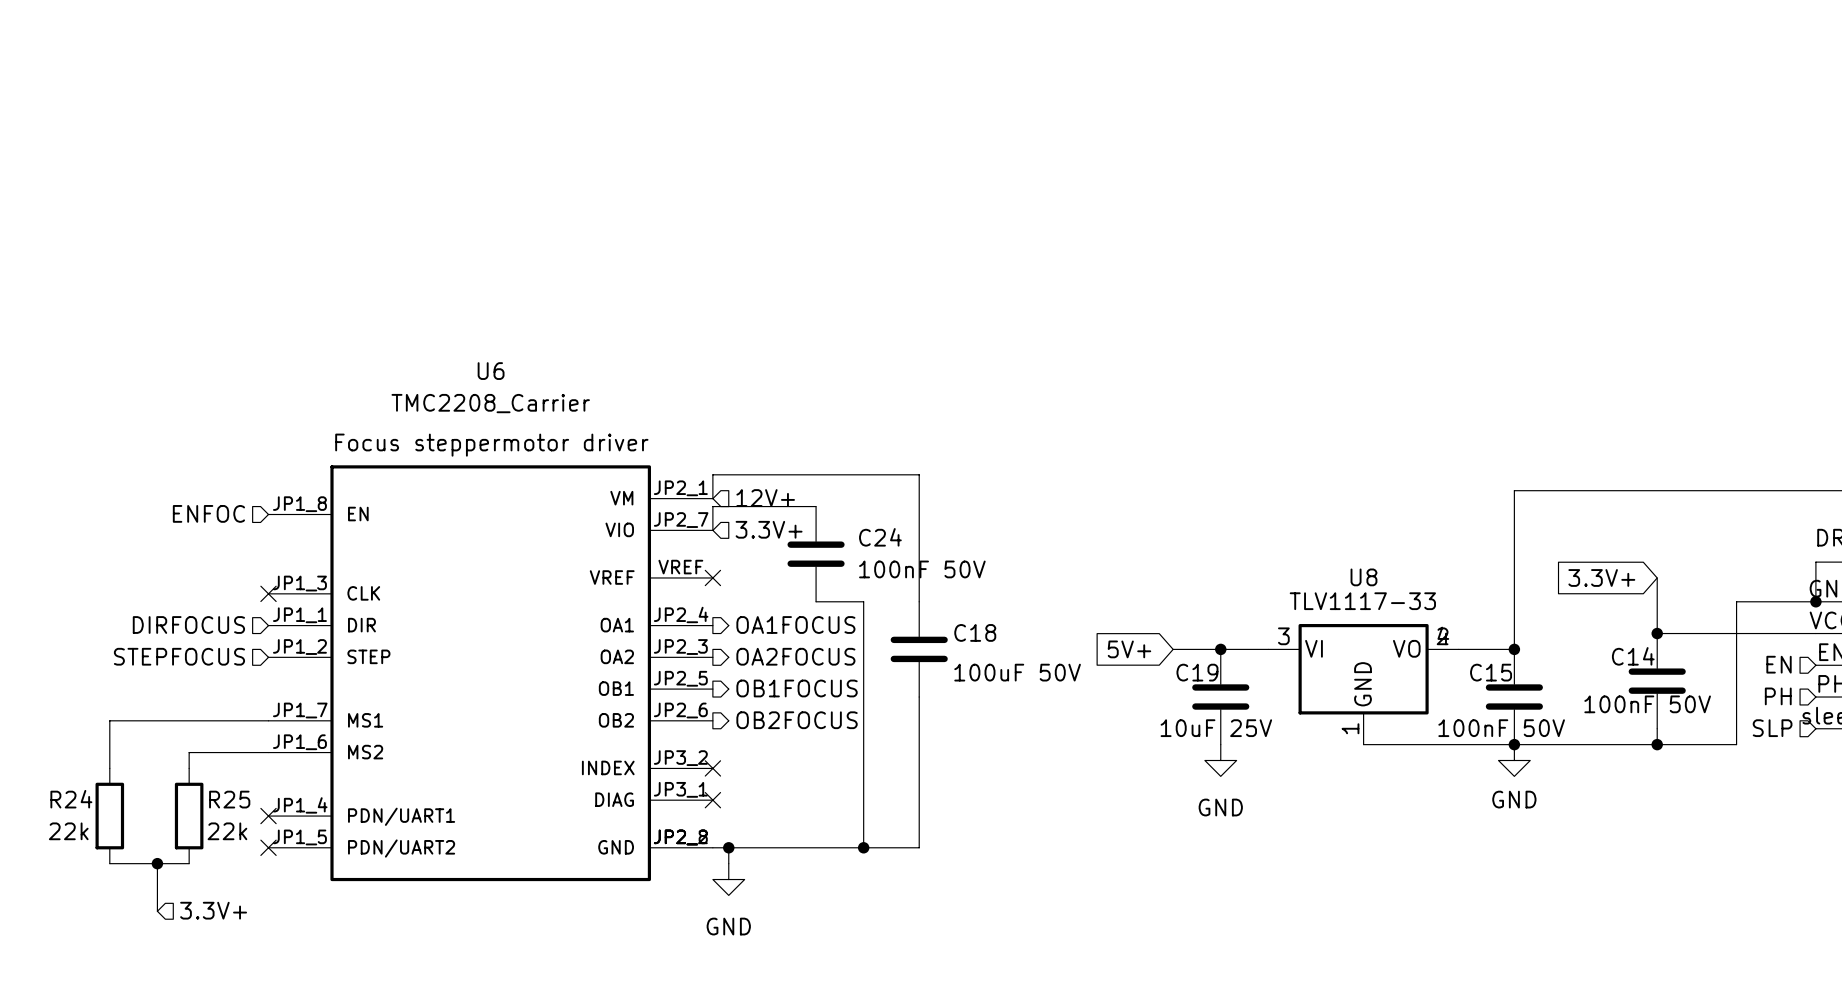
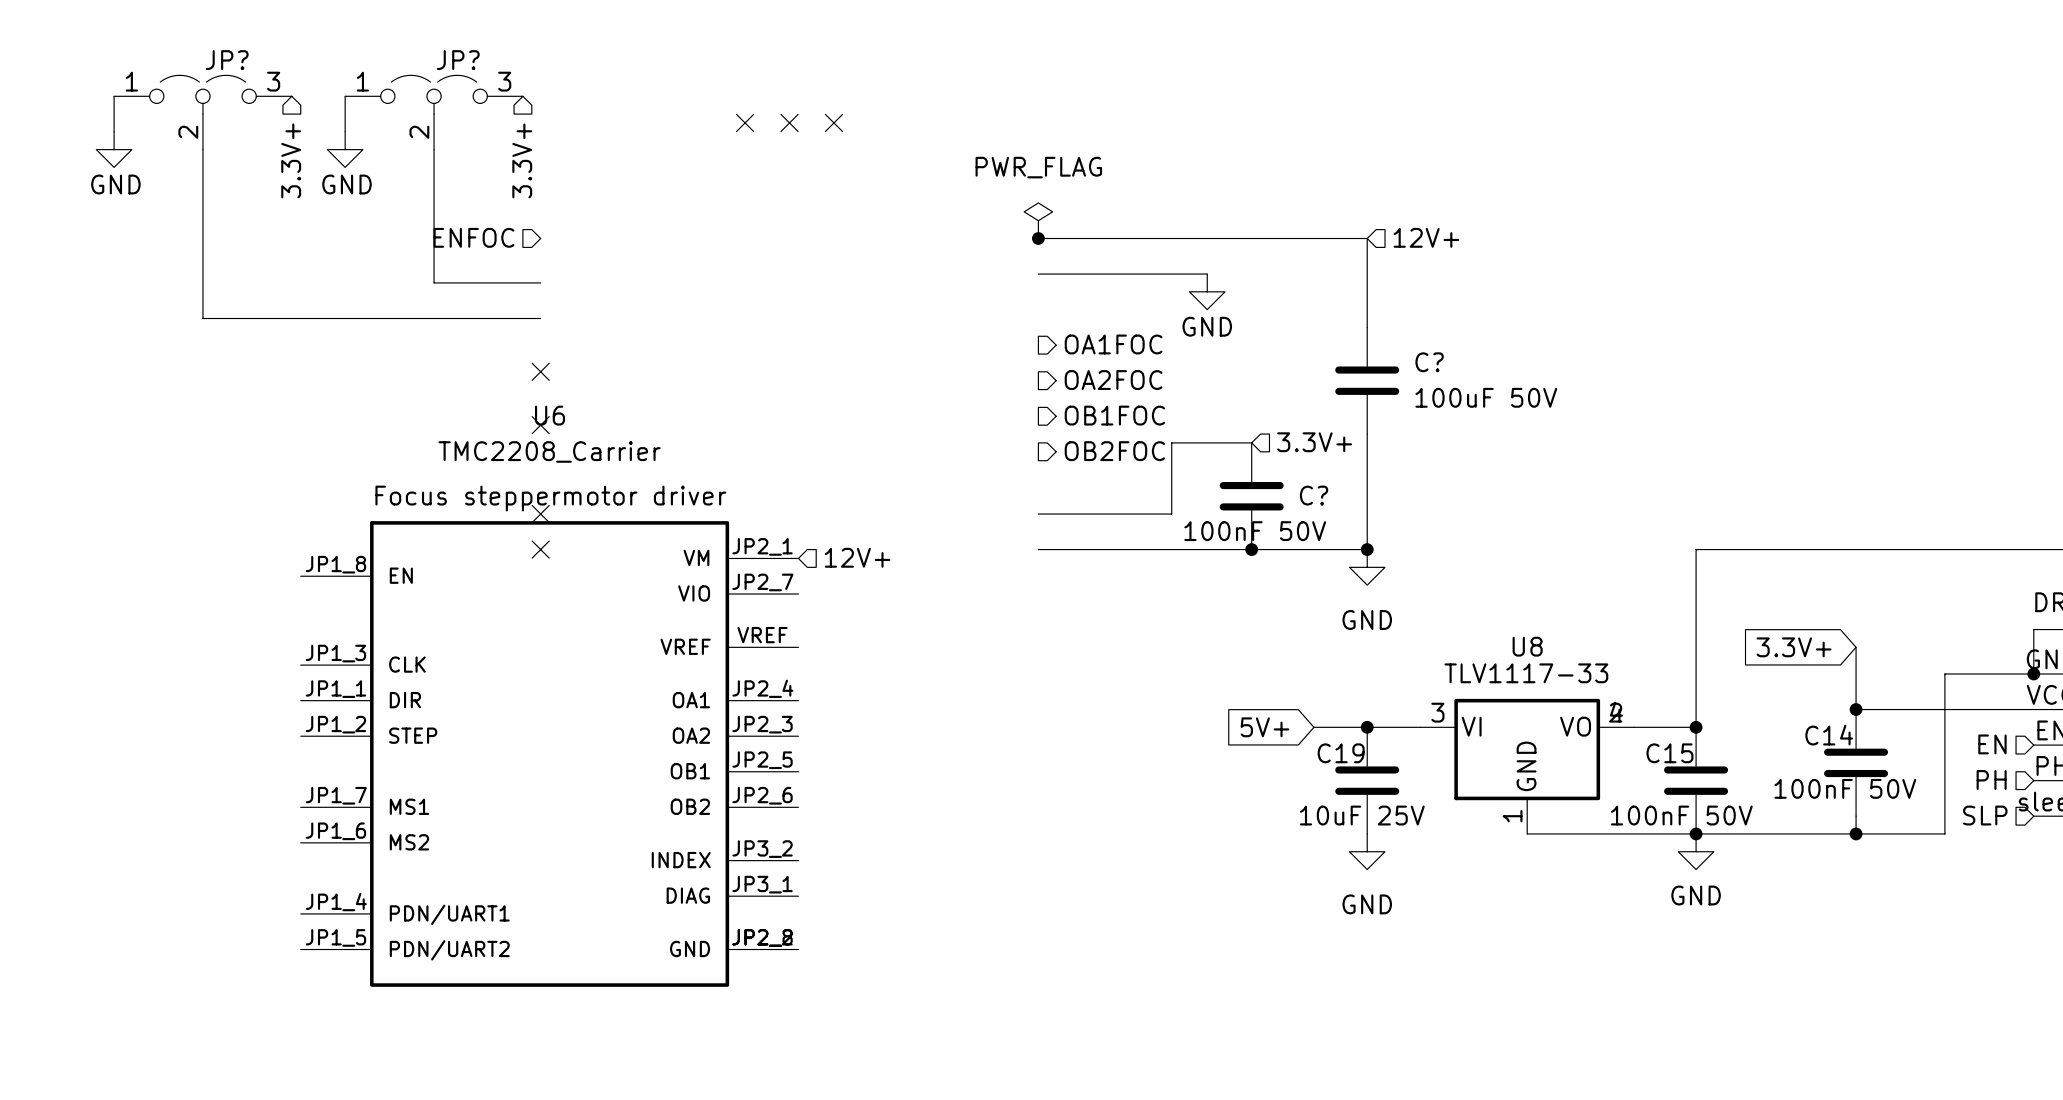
wire: none -> (114, 96) (114, 131)
wire: none -> (345, 96) (345, 131)
JP?: none -> (202, 112)
JP?: none -> (434, 112)
no-connect mark: none -> (745, 122)
no-connect mark: none -> (789, 122)
no-connect mark: none -> (833, 122)
power symbol: none -> GND (114, 149)
wire: none -> (202, 149) (202, 318) (540, 318)
power symbol: none -> GND (345, 149)
wire: none -> (434, 149) (434, 282) (540, 282)
hierarchical label: none -> 3.3V+ (291, 160)
hierarchical label: none -> 3.3V+ (522, 160)
power symbol: none -> PWR_FLAG (1038, 220)
hierarchical label: none -> ENFOC (473, 237)
wire: none -> (1038, 238) (1367, 238) (1367, 327)
junction: none -> (1038, 238)
hierarchical label: none -> 12V+ (1426, 237)
wire: none -> (1038, 274) (1207, 274)
power symbol: none -> GND (1207, 291)
hierarchical label: none -> OA1FOC (1113, 344)
no-connect mark: none -> (540, 371)
hierarchical label: none -> OA2FOC (1113, 380)
C?: none -> 100uF 50V (1367, 380)
hierarchical label: none -> OB1FOC (1114, 415)
no-connect mark: none -> (540, 425)
wire: none -> (1367, 434) (1367, 549) (1038, 549)
hierarchical label: none -> 3.3V+ (1314, 442)
wire: none -> (1251, 442) (1171, 442) (1171, 514) (1038, 514)
hierarchical label: none -> OB2FOC (1114, 451)
C?: none -> 100nF 50V (1251, 496)
no-connect mark: none -> (540, 514)
no-connect mark: none -> (540, 549)
junction: none -> (1251, 549)
junction: none -> (1367, 549)
wire: (712, 498) (712, 474) (919, 474) (919, 601) -> none
wire: (816, 506) (712, 506) (712, 530) -> none
power symbol: none -> GND (1367, 567)
hierarchical label: ENFOC (208, 513) -> none
hierarchical label: 3.3V+ (769, 529) -> none
C24: 100nF 50V (816, 554) -> none
no-connect mark: (712, 577) -> none
no-connect mark: (268, 593) -> none
wire: (816, 601) (863, 601) (863, 847) -> none
hierarchical label: DIRFOCUS (188, 625) -> none
hierarchical label: OA1FOCUS (795, 625) -> none
C18: 100uF 50V (919, 649) -> none
hierarchical label: STEPFOCUS (179, 656) -> none
hierarchical label: OA2FOCUS (795, 656) -> none
hierarchical label: OB1FOCUS (797, 688) -> none
wire: (919, 697) (919, 847) (712, 847) -> none
wire: (268, 720) (109, 720) (109, 768) -> none
hierarchical label: OB2FOCUS (797, 720) -> none
wire: (268, 752) (189, 752) (189, 768) -> none
no-connect mark: (712, 768) -> none
no-connect mark: (712, 800) -> none
R24: 22k (109, 816) -> none
R25: 22k (189, 816) -> none
no-connect mark: (268, 816) -> none
no-connect mark: (268, 847) -> none
wire: (728, 847) (728, 863) -> none
junction: (728, 847) -> none
junction: (863, 847) -> none
wire: (109, 863) (189, 863) -> none
wire: (157, 863) (157, 911) -> none
junction: (157, 863) -> none
power symbol: GND (728, 879) -> none
hierarchical label: 3.3V+ (213, 910) -> none

